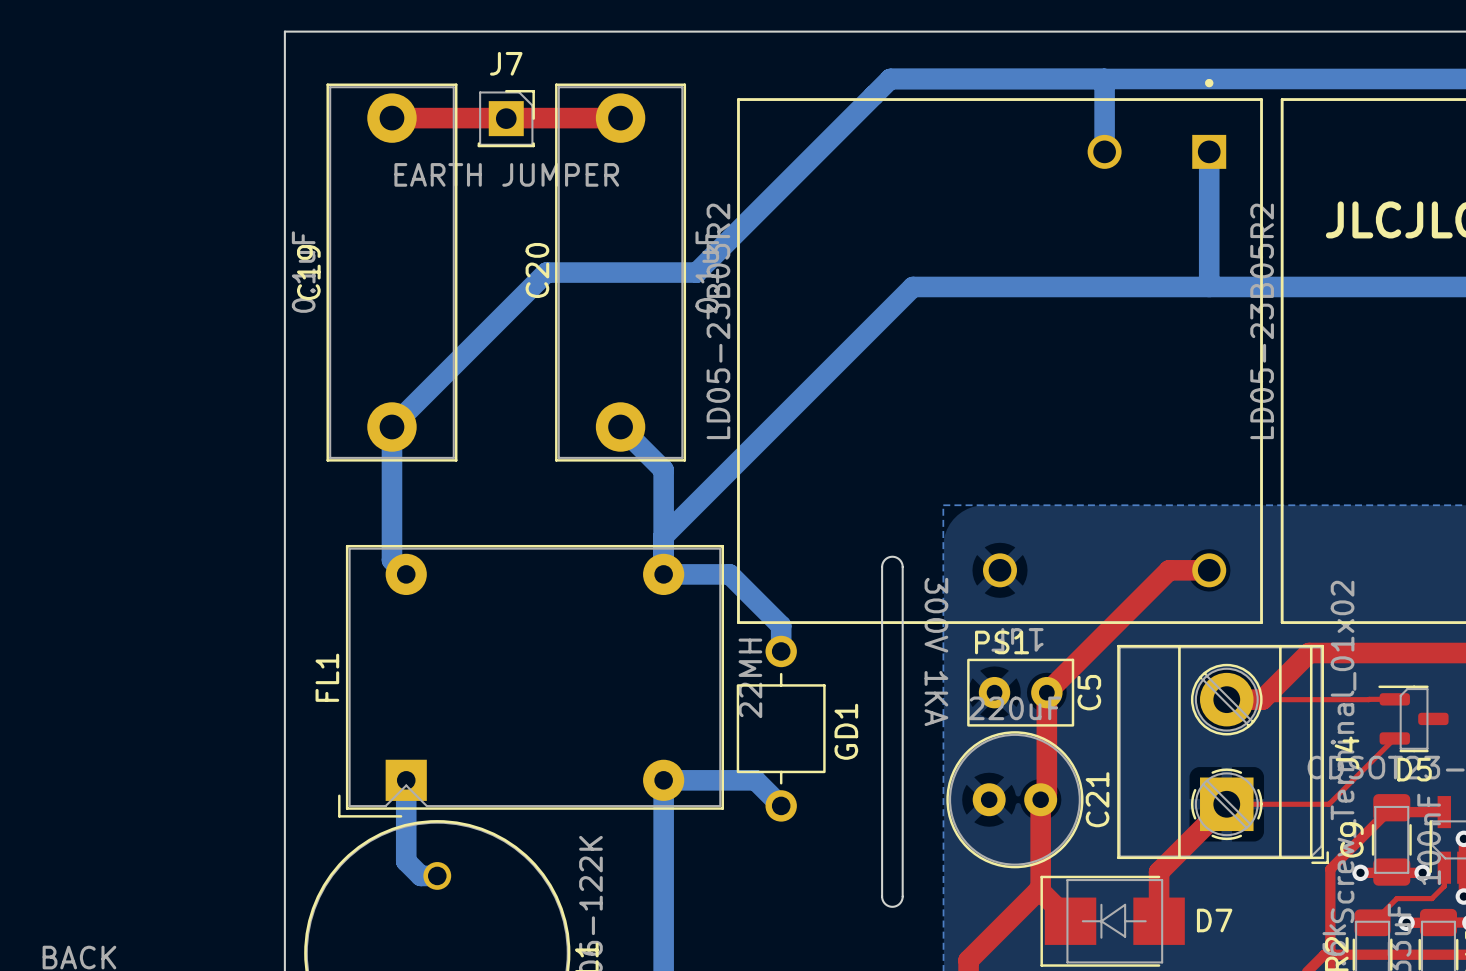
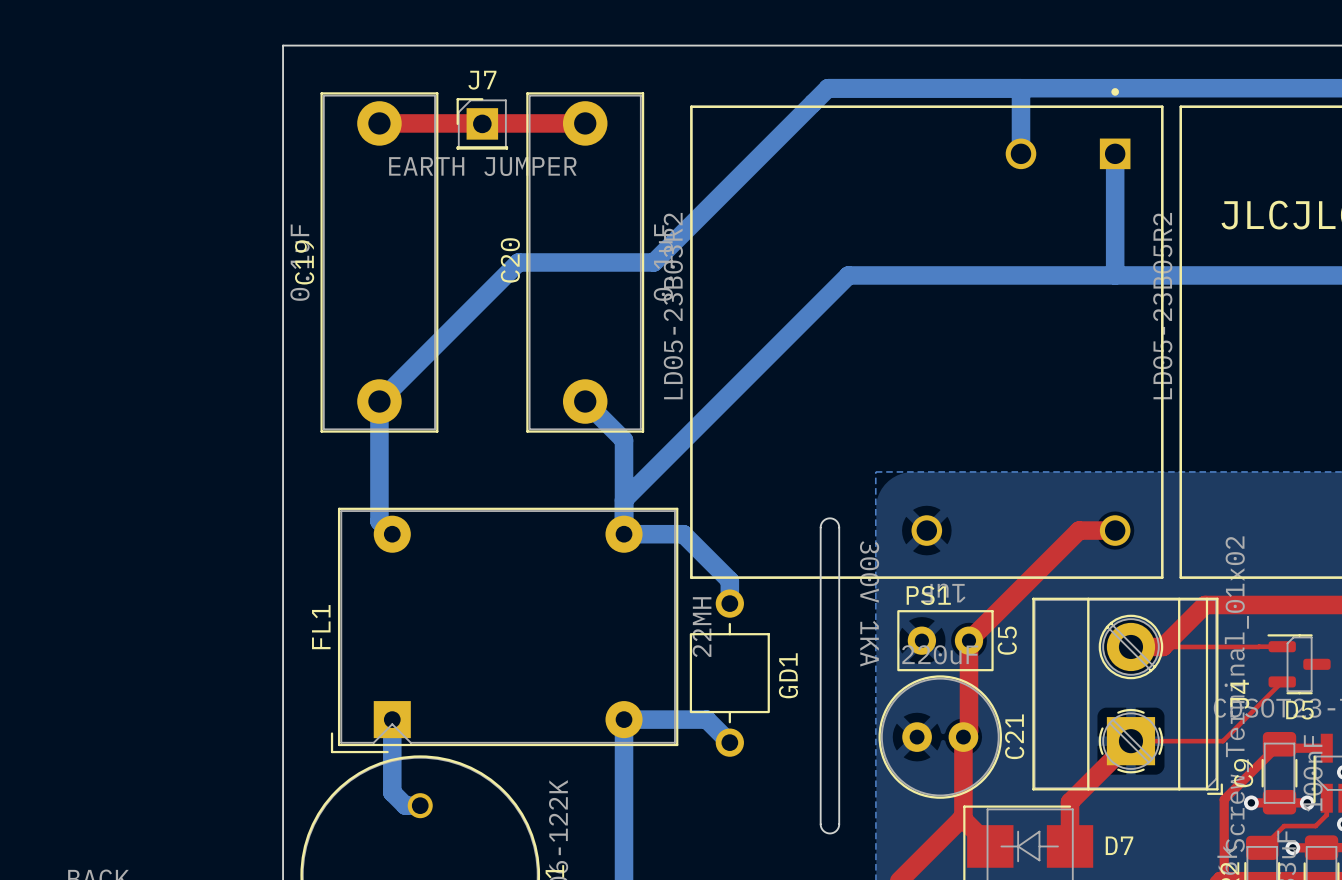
J7 footprint: [477, 89, 535, 148] -> [456, 98, 509, 150]

